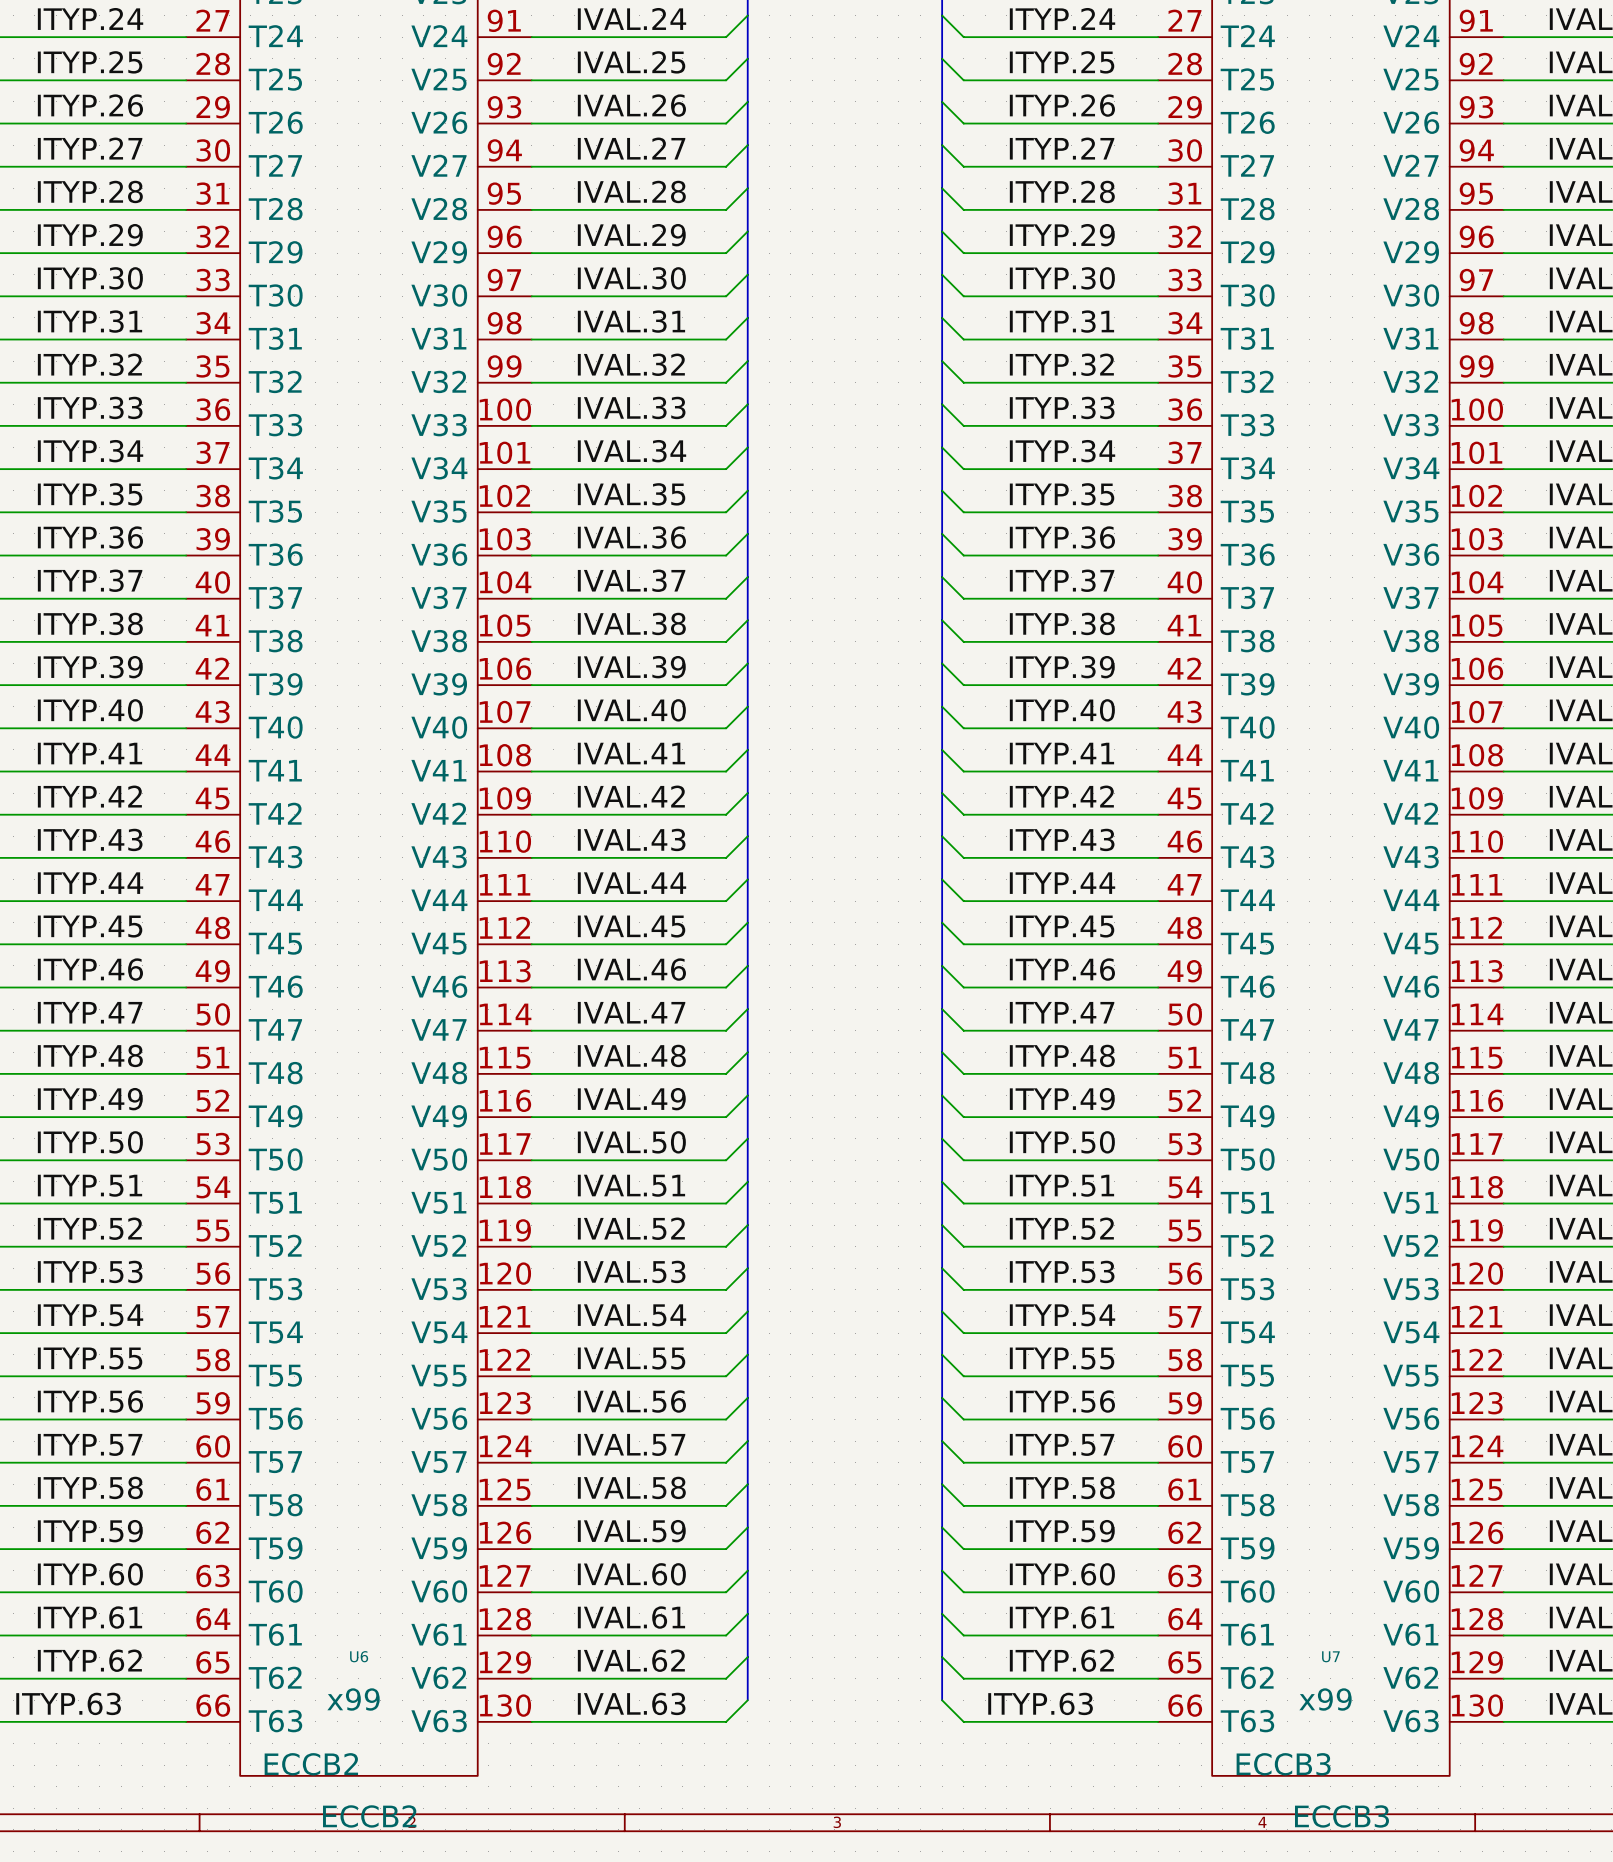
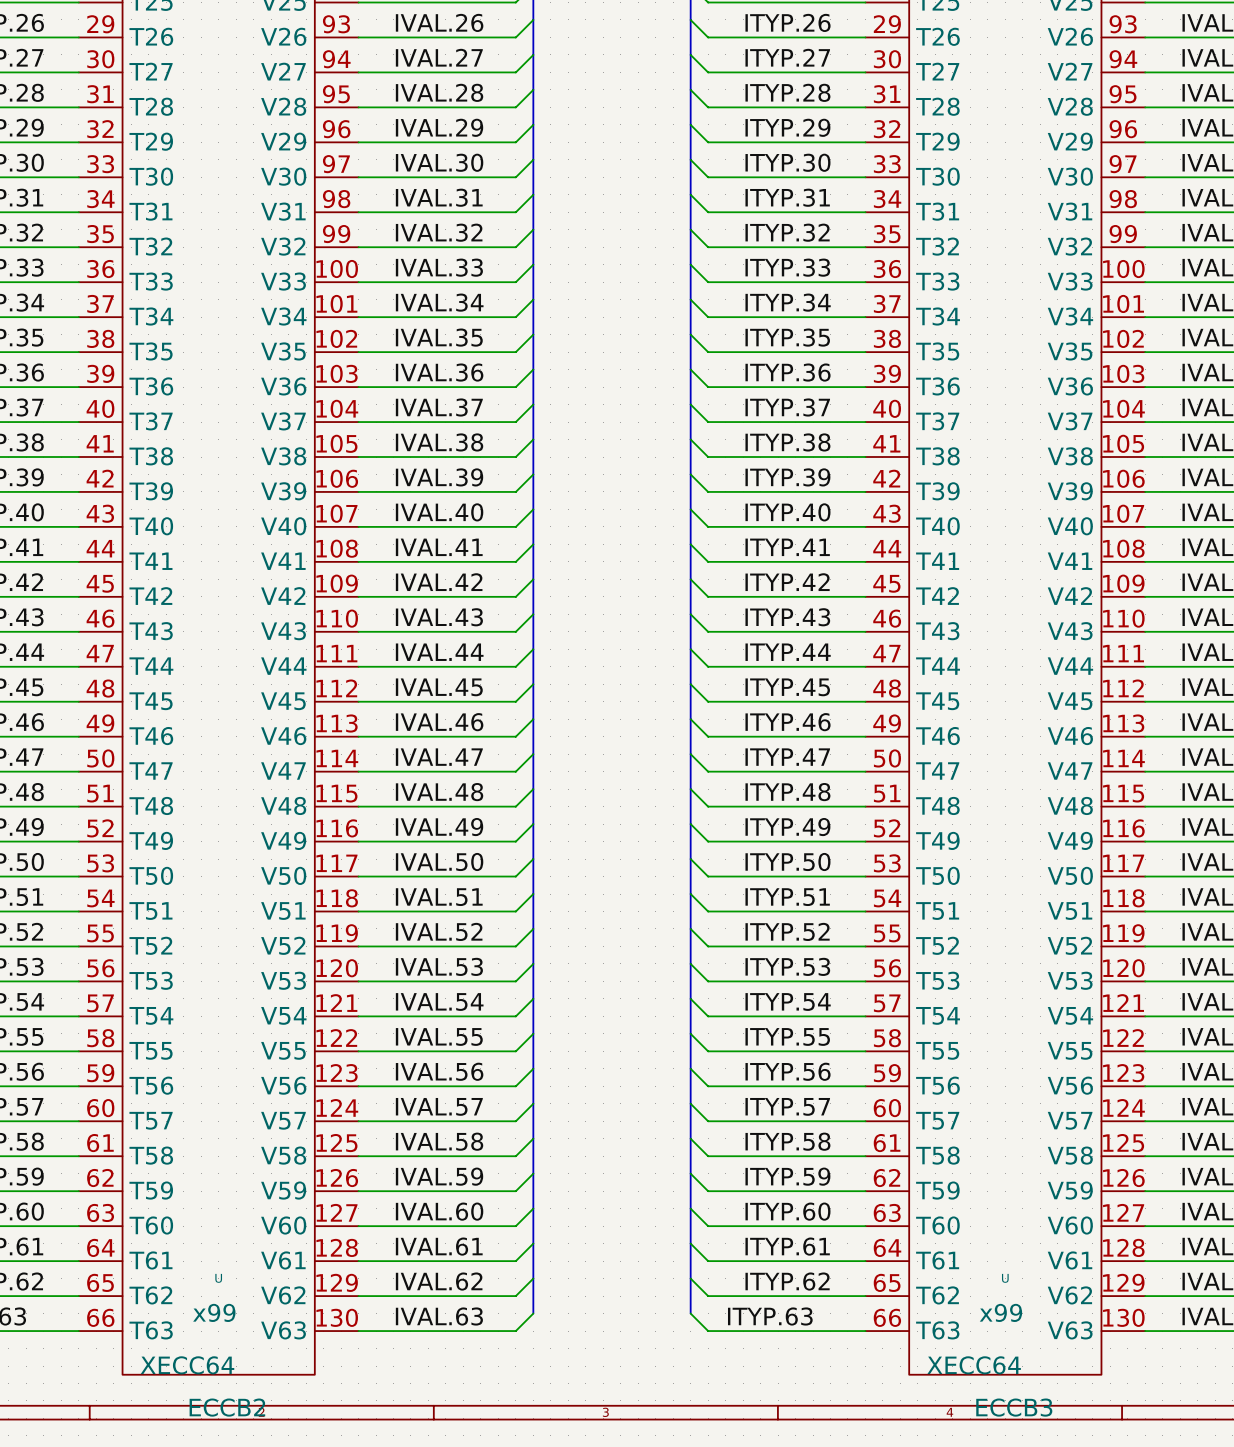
U6 name: U6 (359, 1656) -> U (218, 1278)
U7 name: U7 (1330, 1656) -> U (1005, 1278)
U6 value: ECCB2 (311, 1764) -> XECC64 (187, 1365)
U7 value: ECCB3 (1283, 1764) -> XECC64 (974, 1365)

